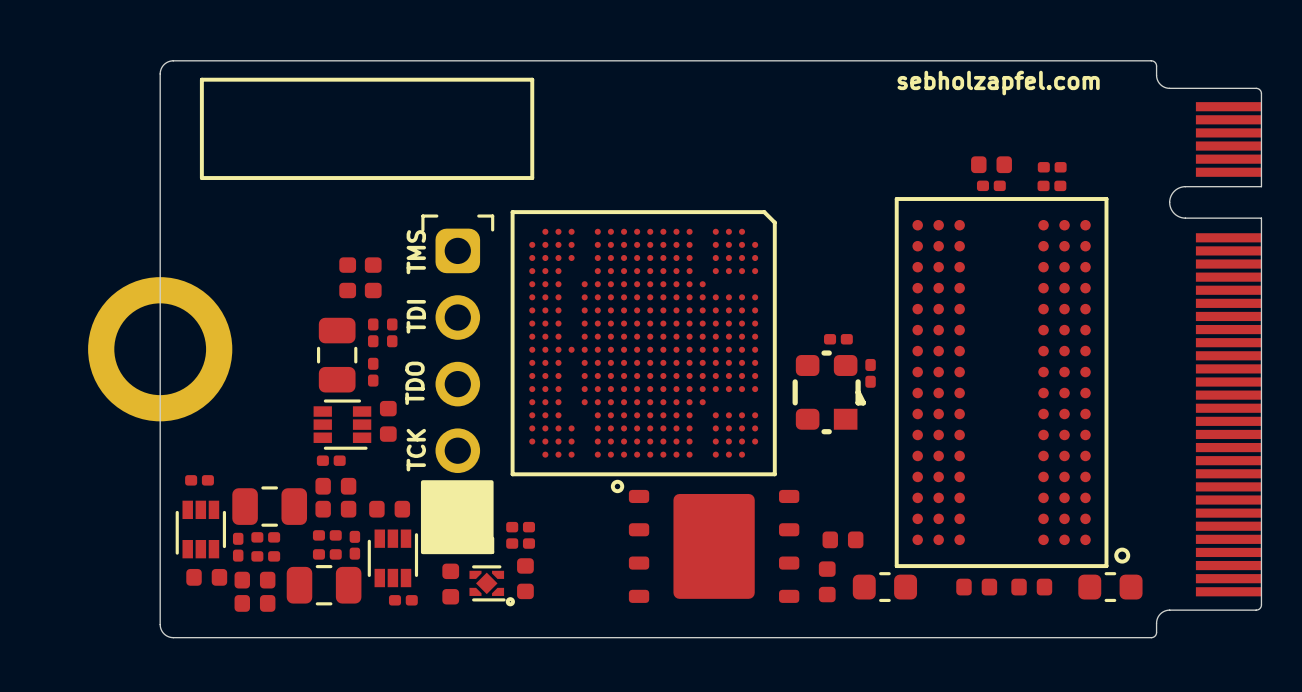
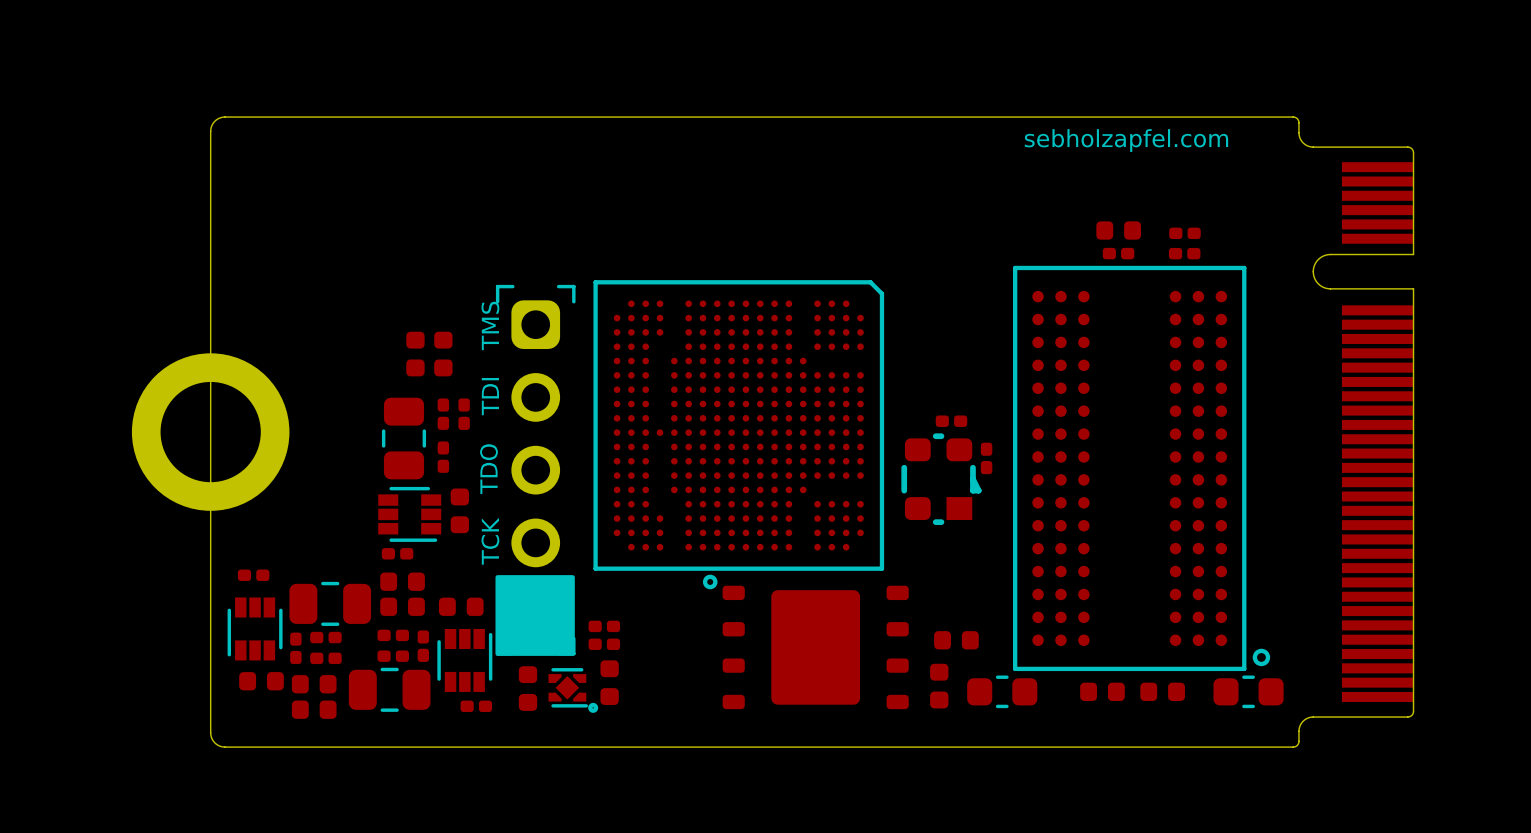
line: (201, 79) (532, 79) (532, 178) (201, 178) (201, 79) -> none

